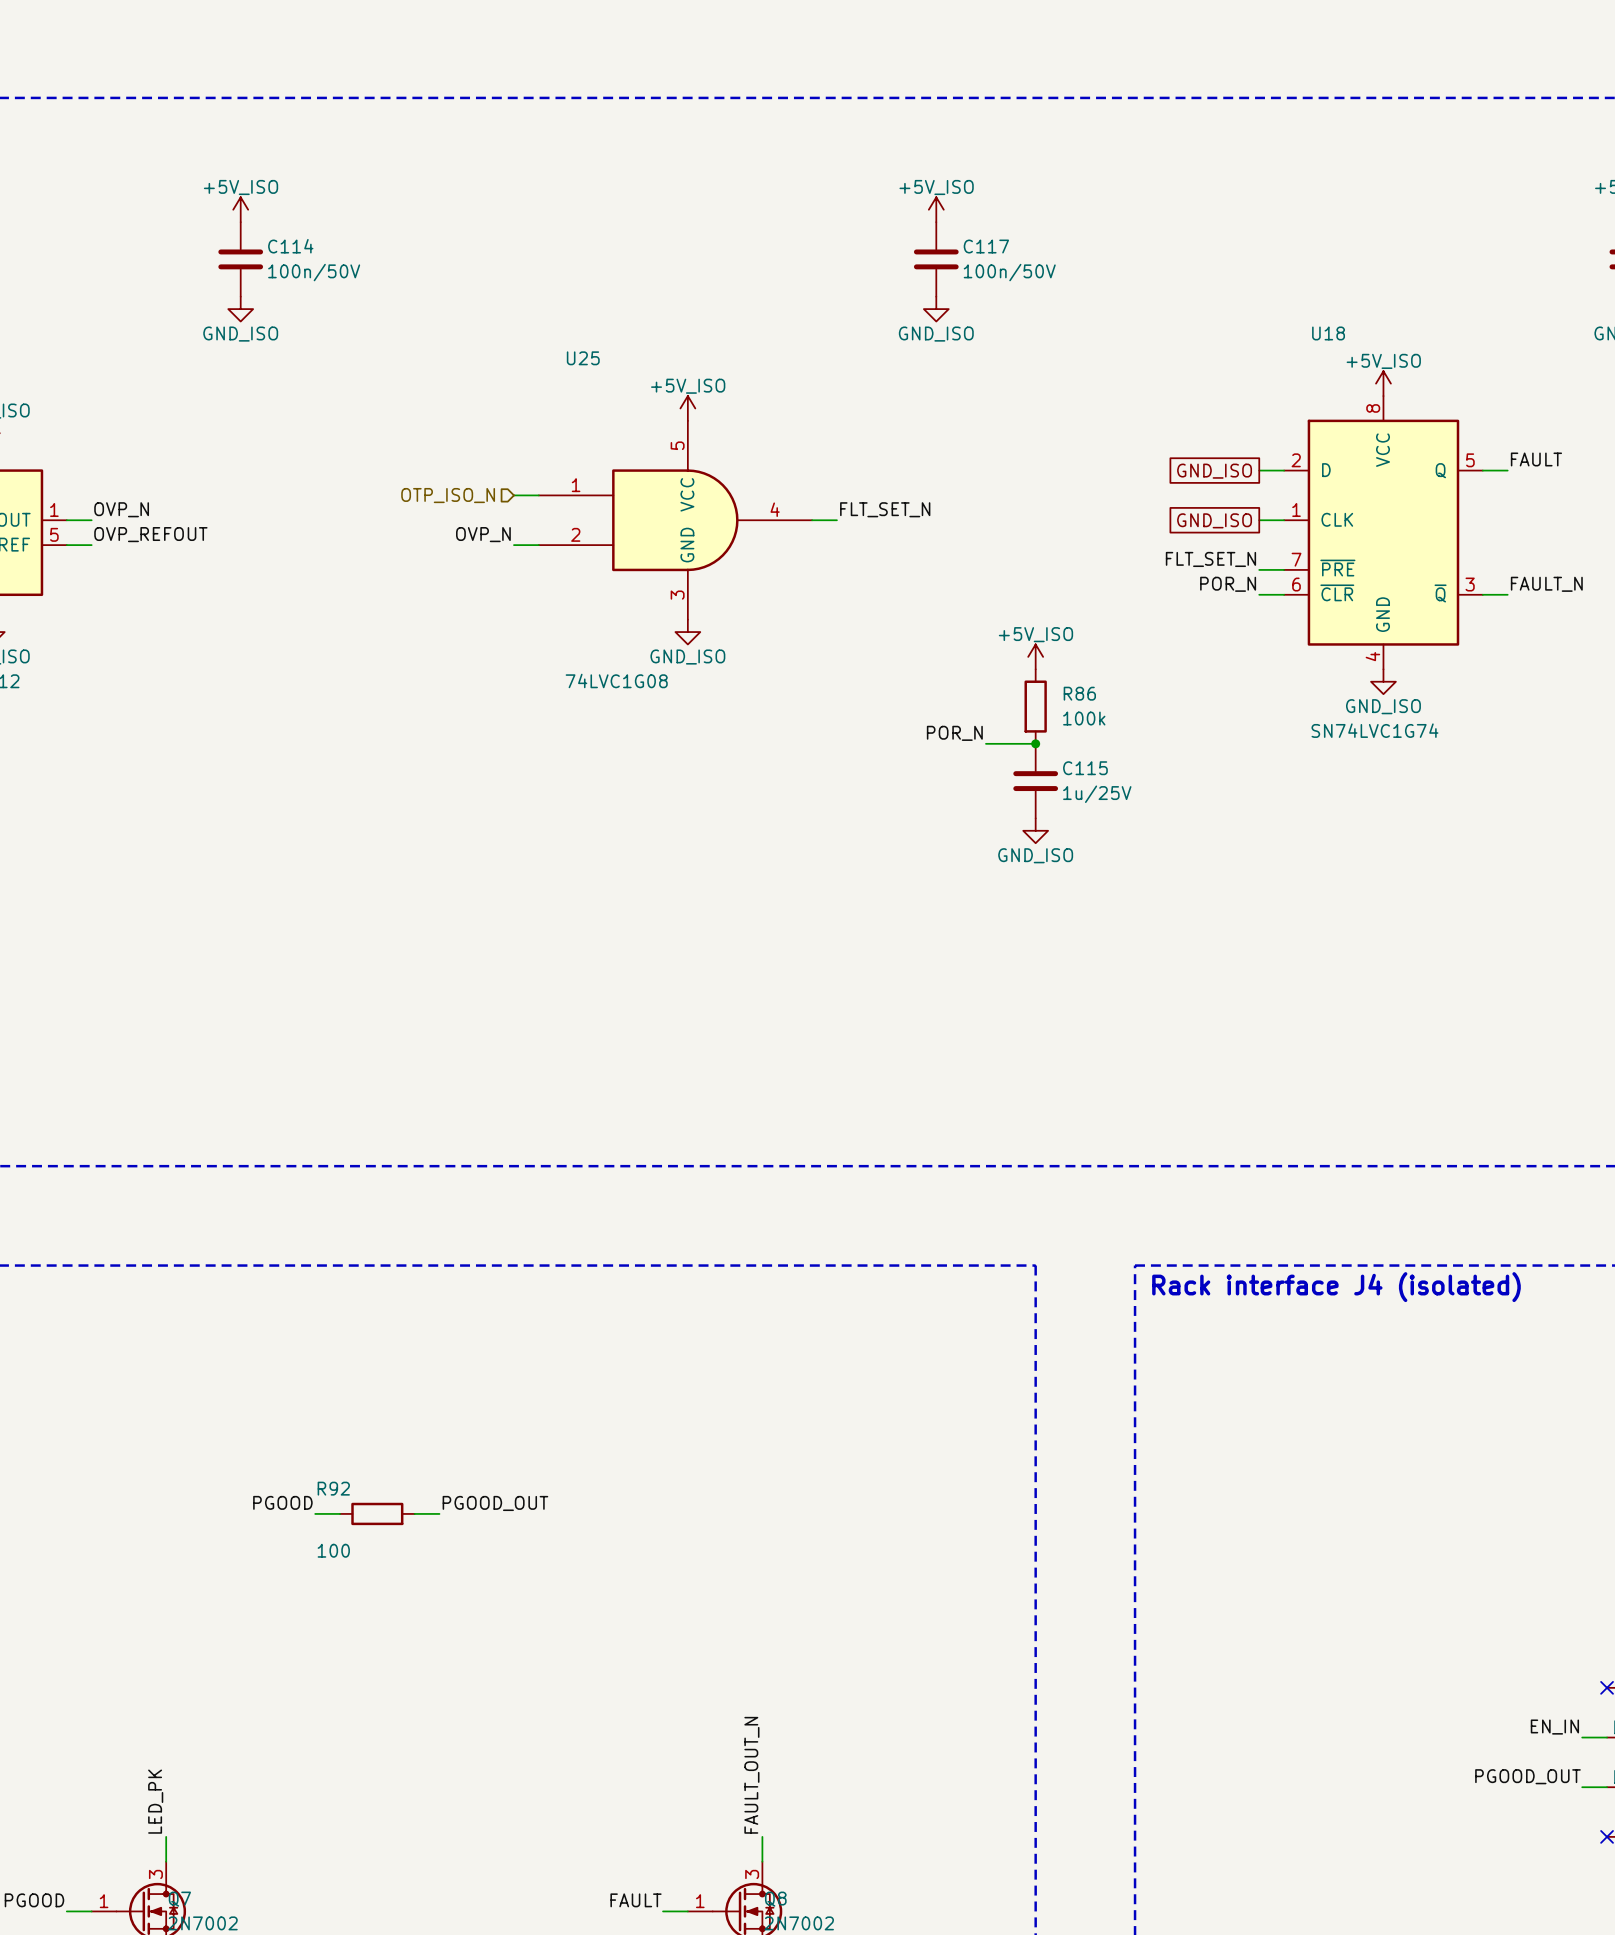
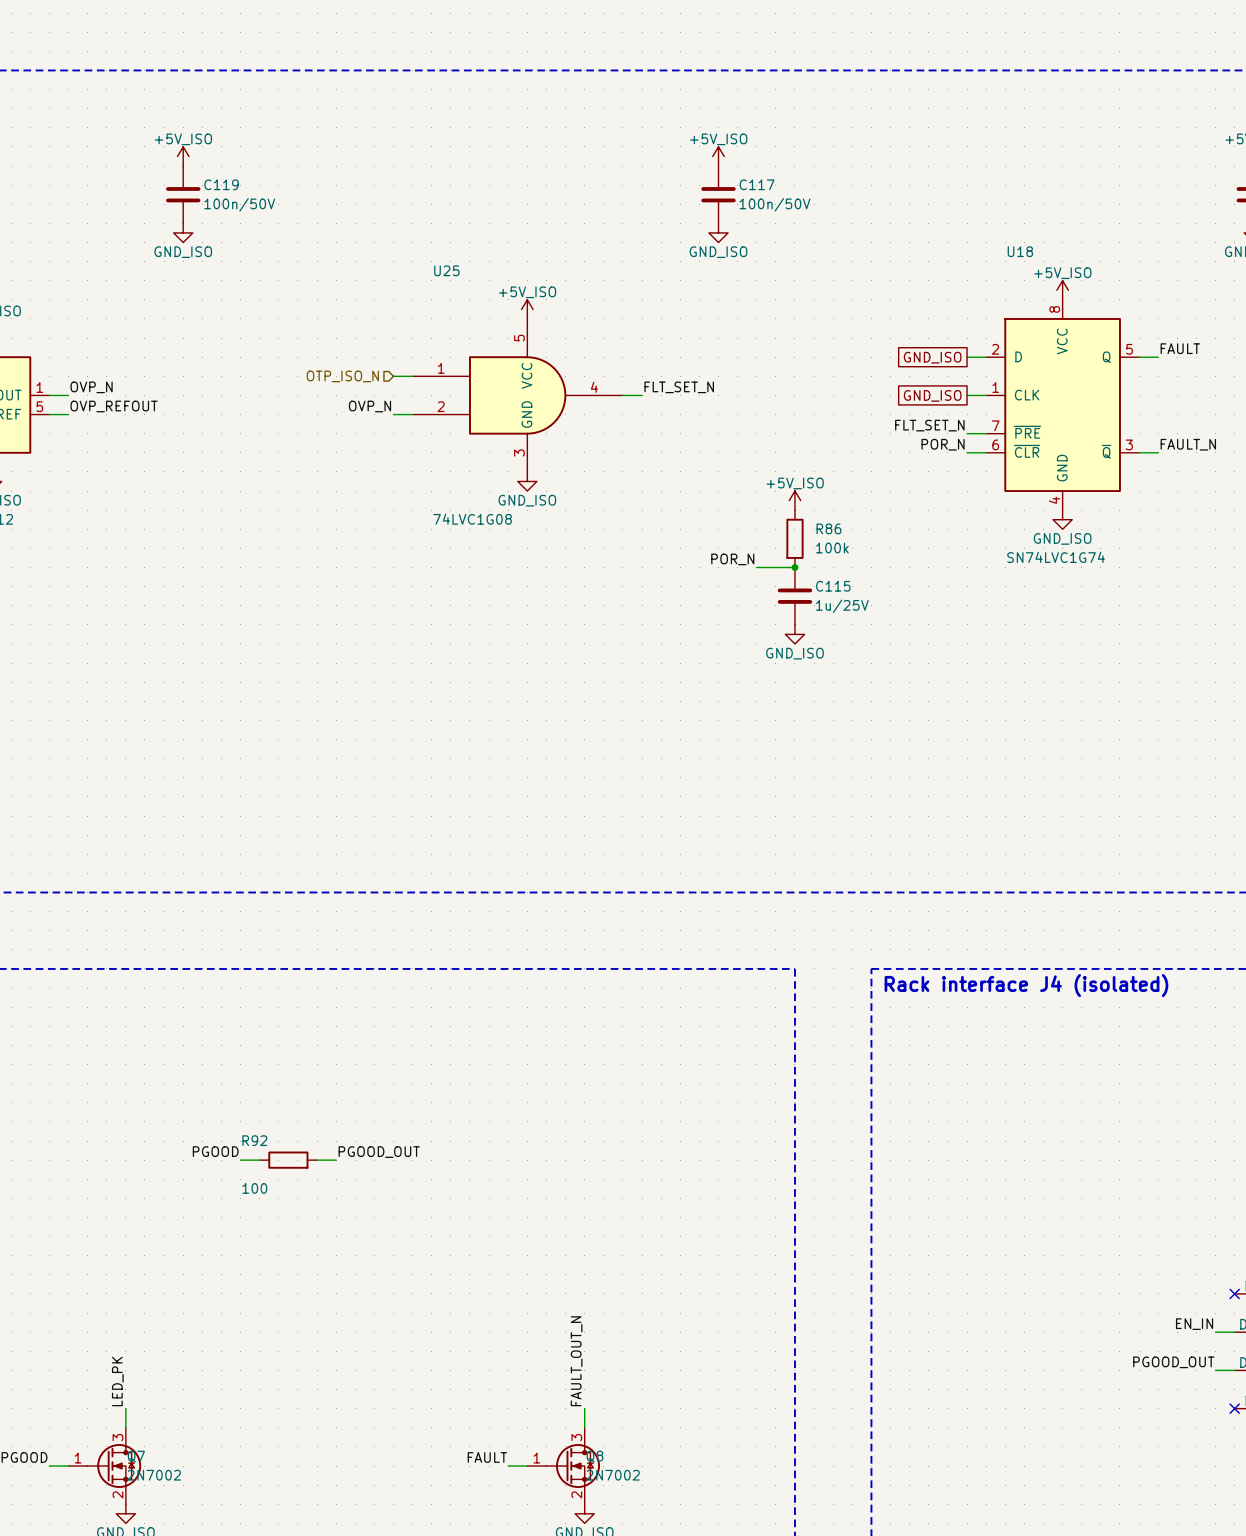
C114 name: C114 (290, 246) -> C119 (221, 184)

